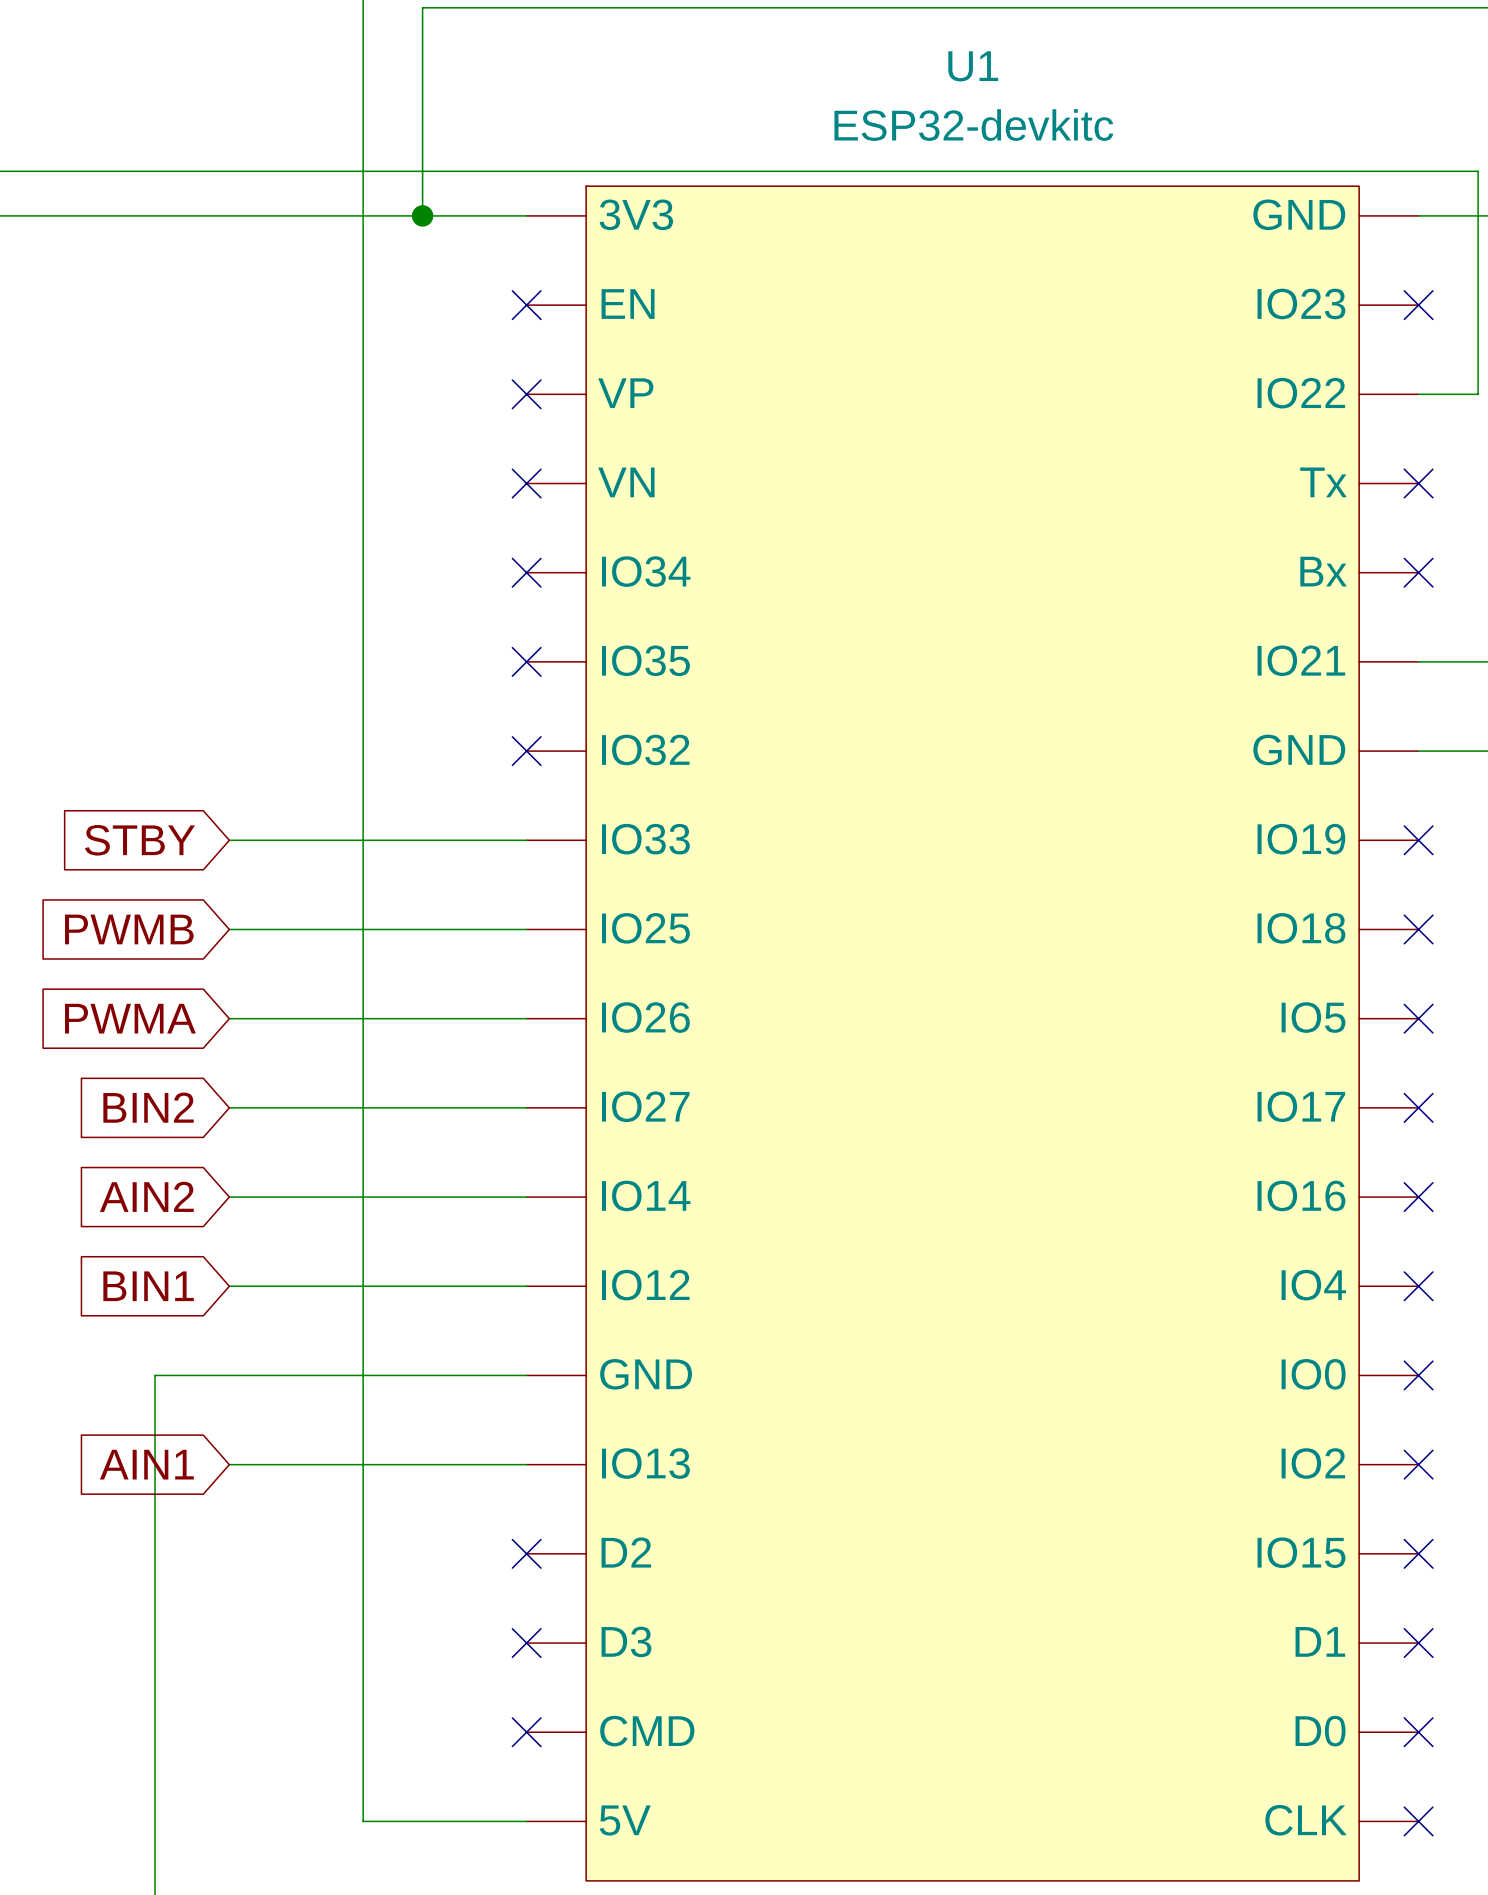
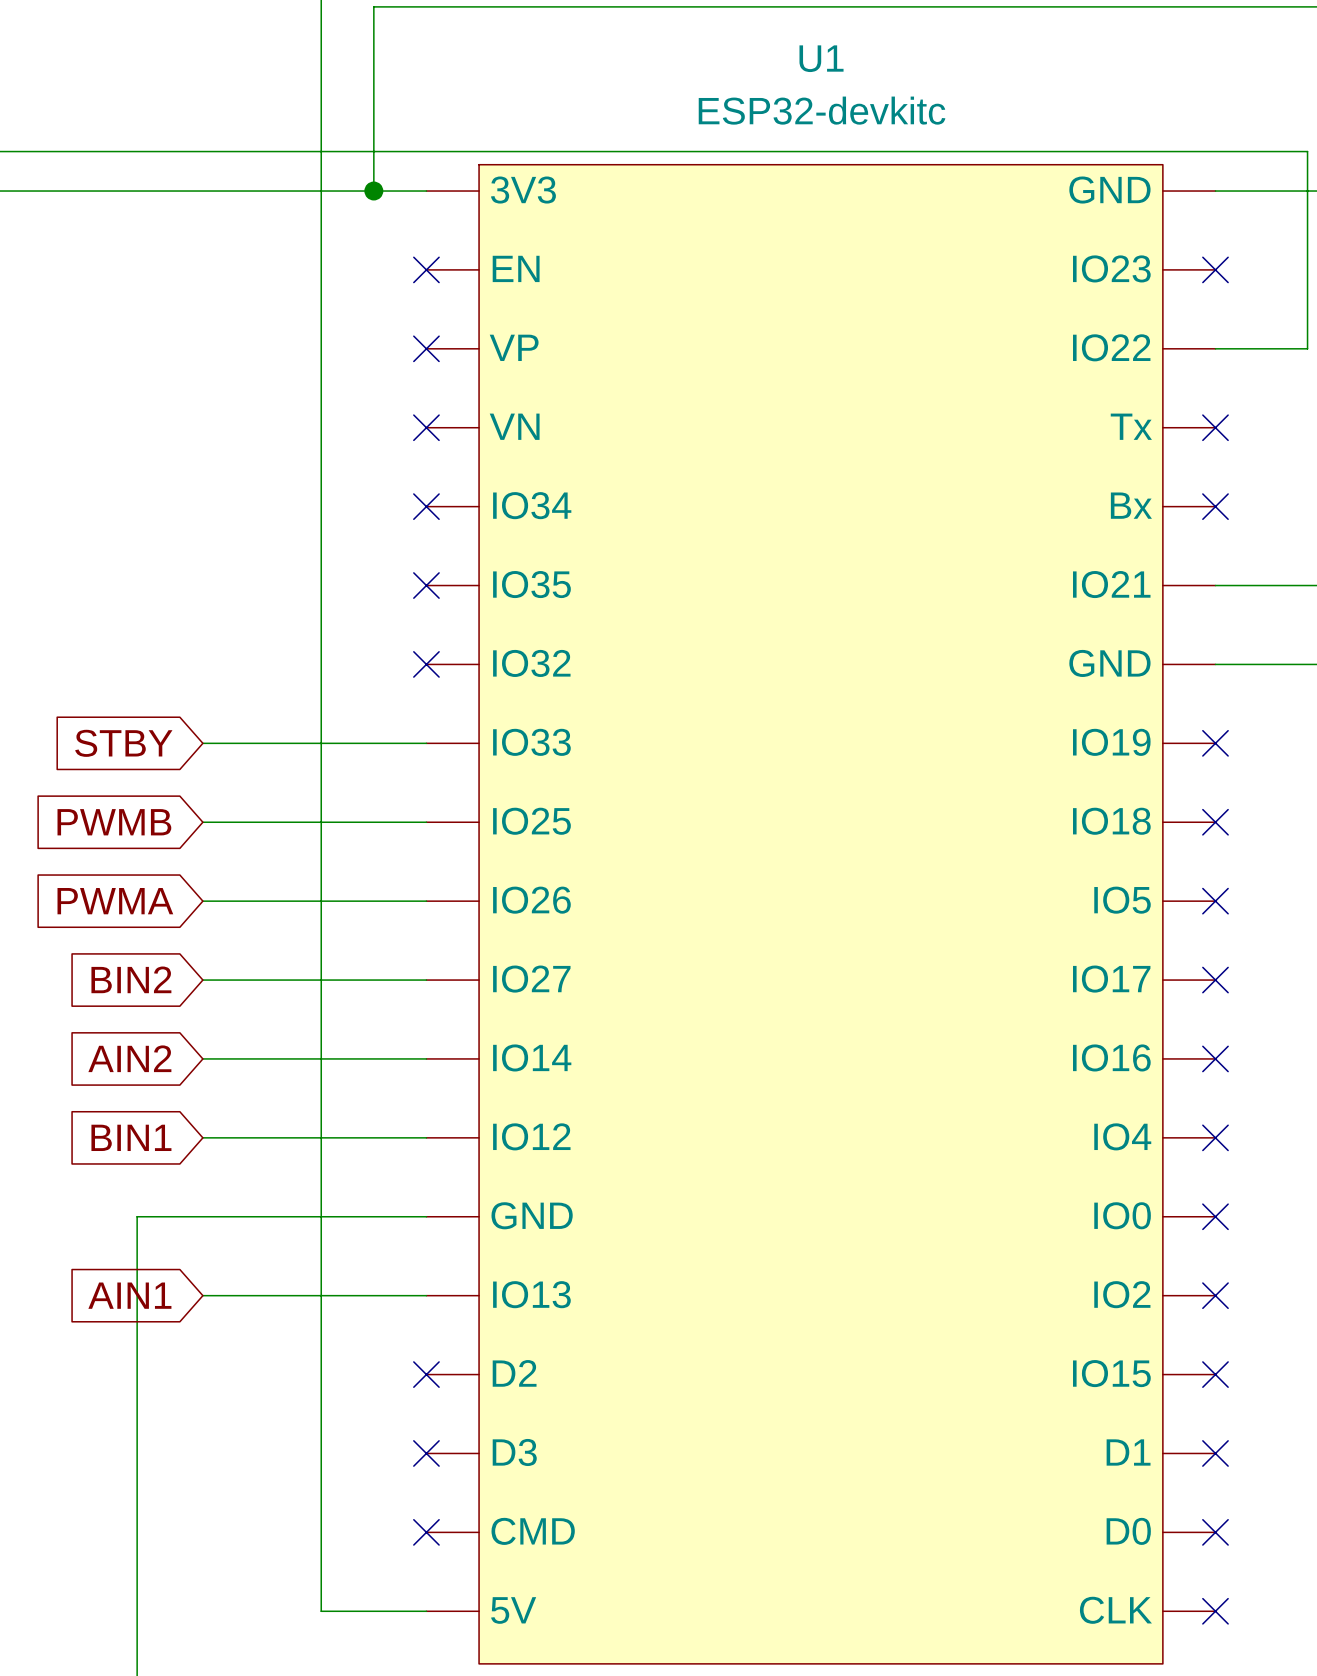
no-connect mark position: (526, 305) -> (426, 269)
no-connect mark position: (1418, 305) -> (1215, 269)
no-connect mark position: (526, 394) -> (426, 348)
no-connect mark position: (526, 483) -> (426, 427)
no-connect mark position: (1418, 483) -> (1215, 427)
no-connect mark position: (526, 572) -> (426, 506)
no-connect mark position: (1418, 572) -> (1215, 506)
no-connect mark position: (526, 661) -> (426, 585)
no-connect mark position: (526, 751) -> (426, 664)
no-connect mark position: (1418, 840) -> (1215, 743)
no-connect mark position: (1418, 929) -> (1215, 822)
no-connect mark position: (1418, 1018) -> (1215, 901)
U1 position: (972, 1033) -> (820, 914)
no-connect mark position: (1418, 1107) -> (1215, 980)
no-connect mark position: (1418, 1197) -> (1215, 1058)
no-connect mark position: (1418, 1286) -> (1215, 1137)
no-connect mark position: (1418, 1375) -> (1215, 1216)
no-connect mark position: (1418, 1464) -> (1215, 1295)
no-connect mark position: (526, 1553) -> (426, 1374)
no-connect mark position: (1418, 1553) -> (1215, 1374)
no-connect mark position: (526, 1643) -> (426, 1453)
no-connect mark position: (1418, 1643) -> (1215, 1453)
no-connect mark position: (526, 1732) -> (426, 1532)
no-connect mark position: (1418, 1732) -> (1215, 1532)
no-connect mark position: (1418, 1821) -> (1215, 1611)

